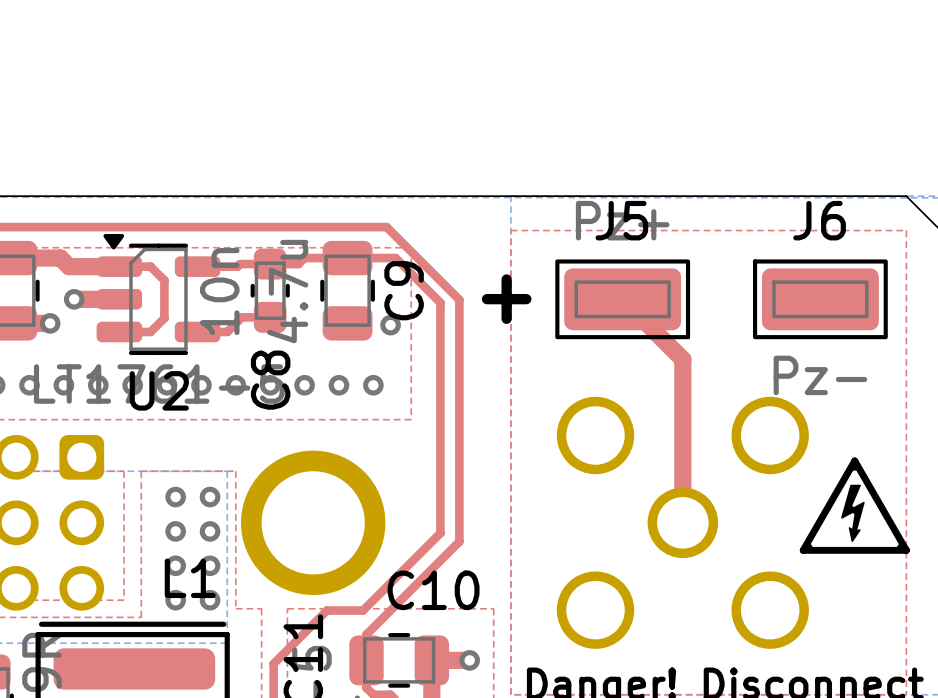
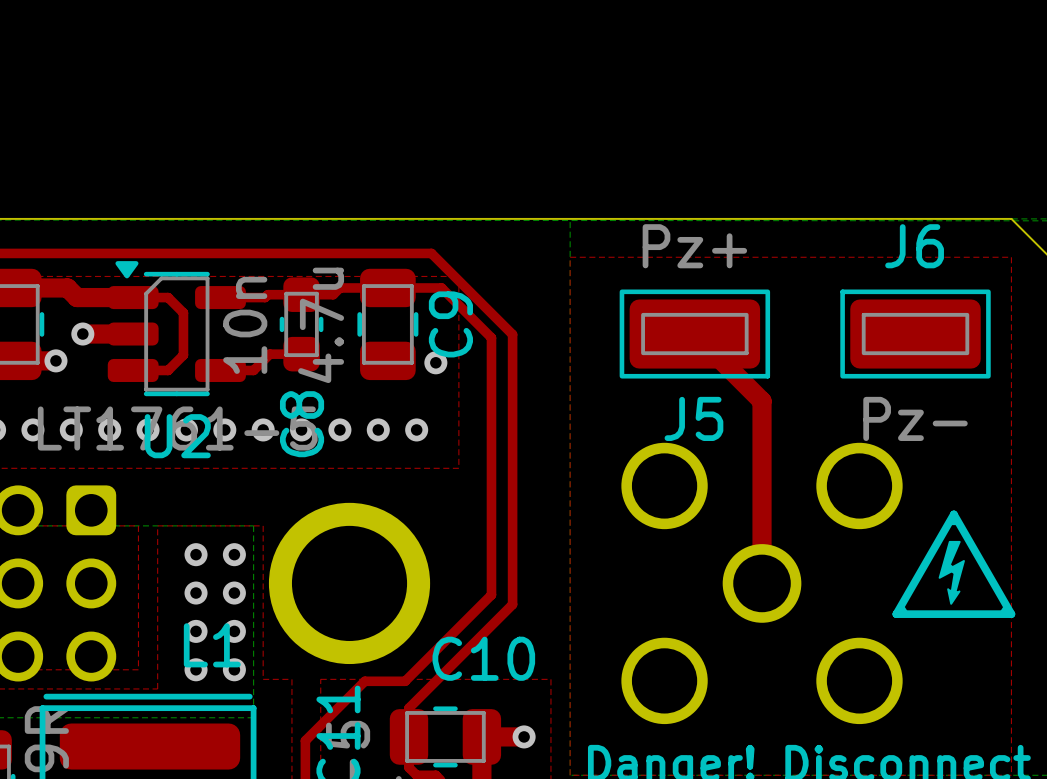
J5 name position: J5 (621, 220) -> J5 (693, 418)
text: + (506, 299) -> none

